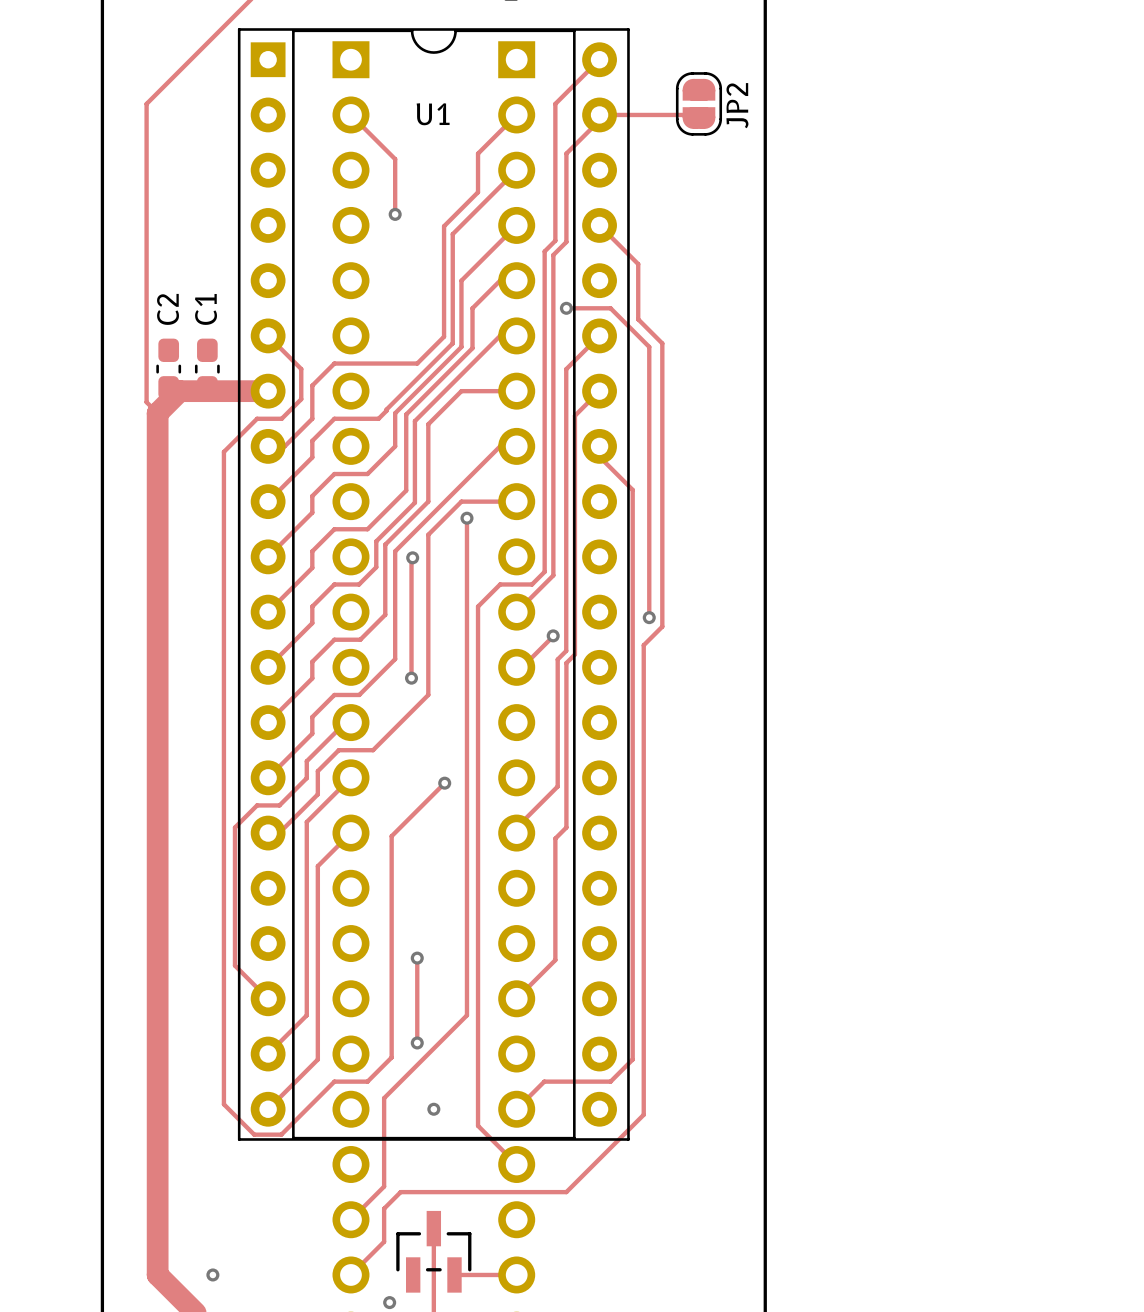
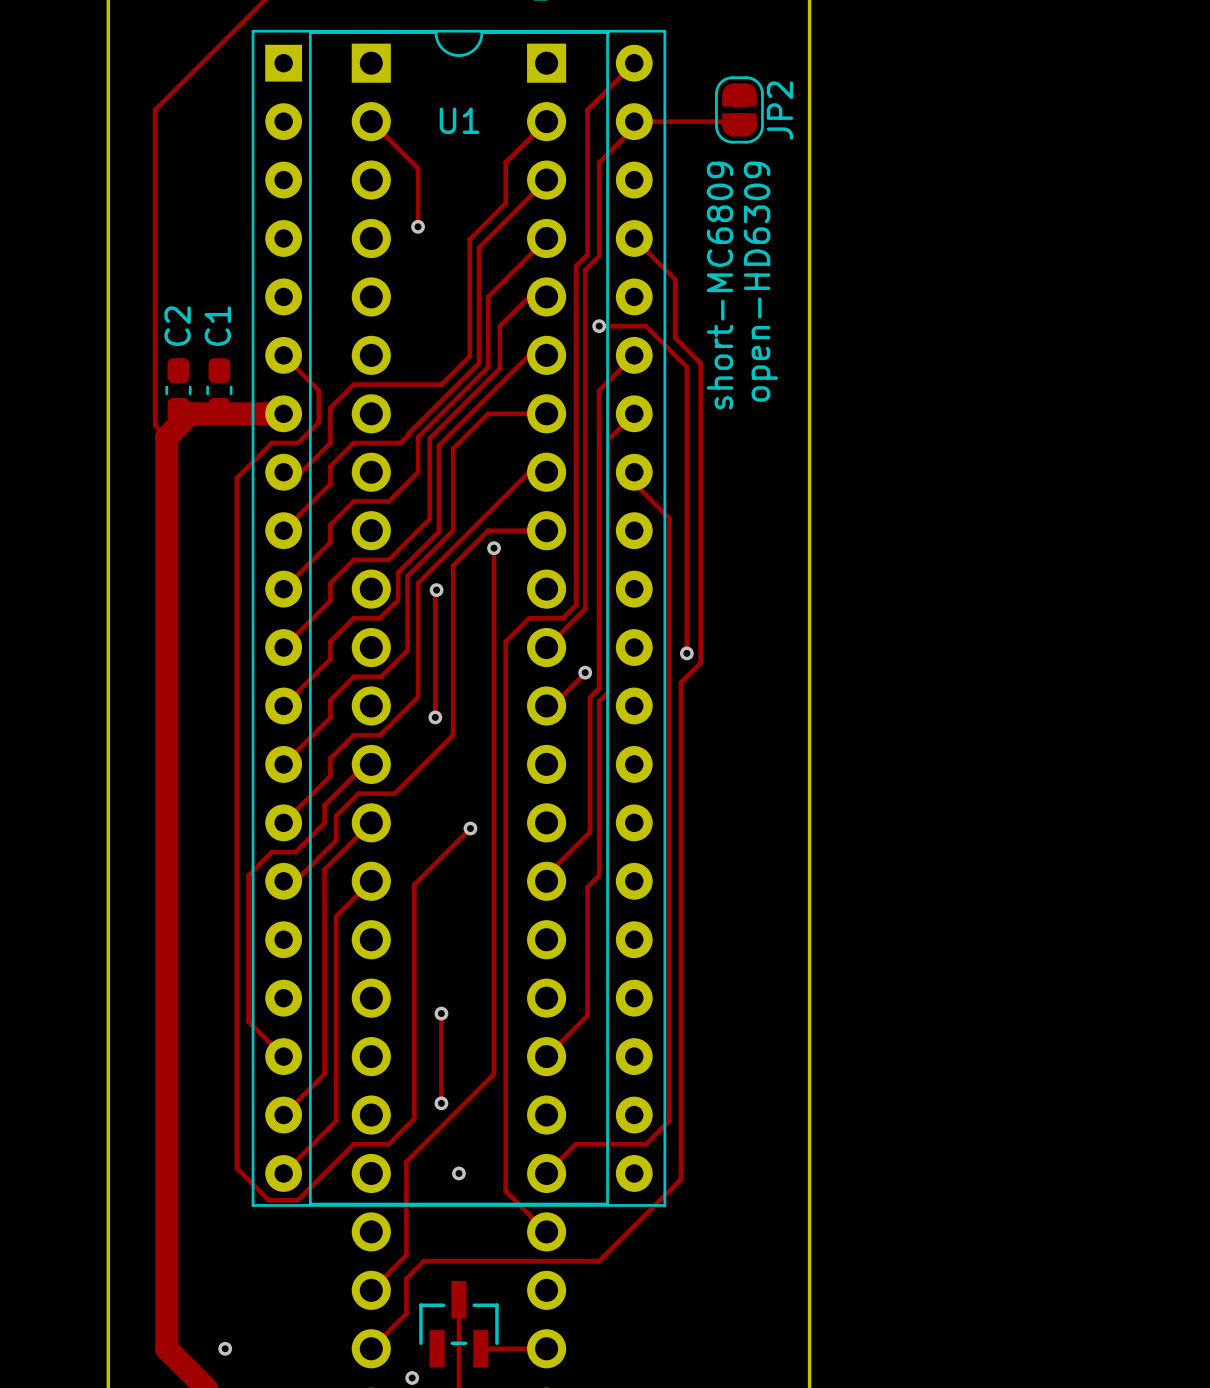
text: none -> open-HD6309 (760, 281)
text: none -> short-MC6809 (720, 285)

